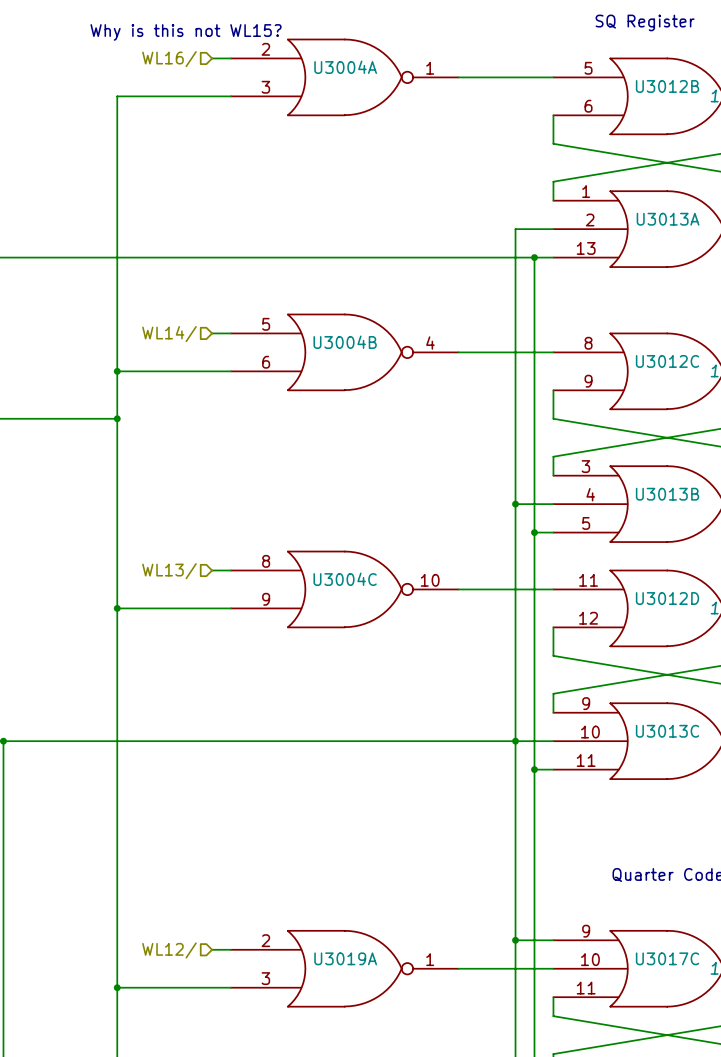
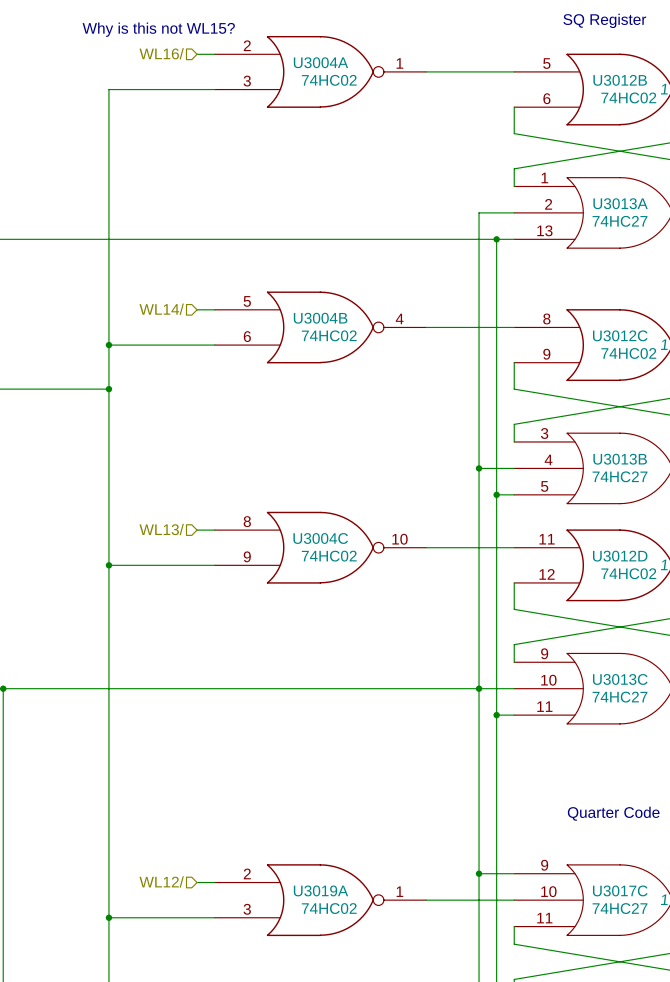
U3004A value: none -> 74HC02 (329, 80)
U3012B value: none -> 74HC02 (628, 97)
U3013A value: none -> 74HC27 (619, 221)
U3004B value: none -> 74HC02 (329, 335)
U3012C value: none -> 74HC02 (628, 353)
U3013B value: none -> 74HC27 (619, 476)
U3004C value: none -> 74HC02 (329, 556)
U3012D value: none -> 74HC02 (628, 573)
U3013C value: none -> 74HC27 (619, 697)
U3019A value: none -> 74HC02 (329, 908)
U3017C value: none -> 74HC27 (619, 908)

